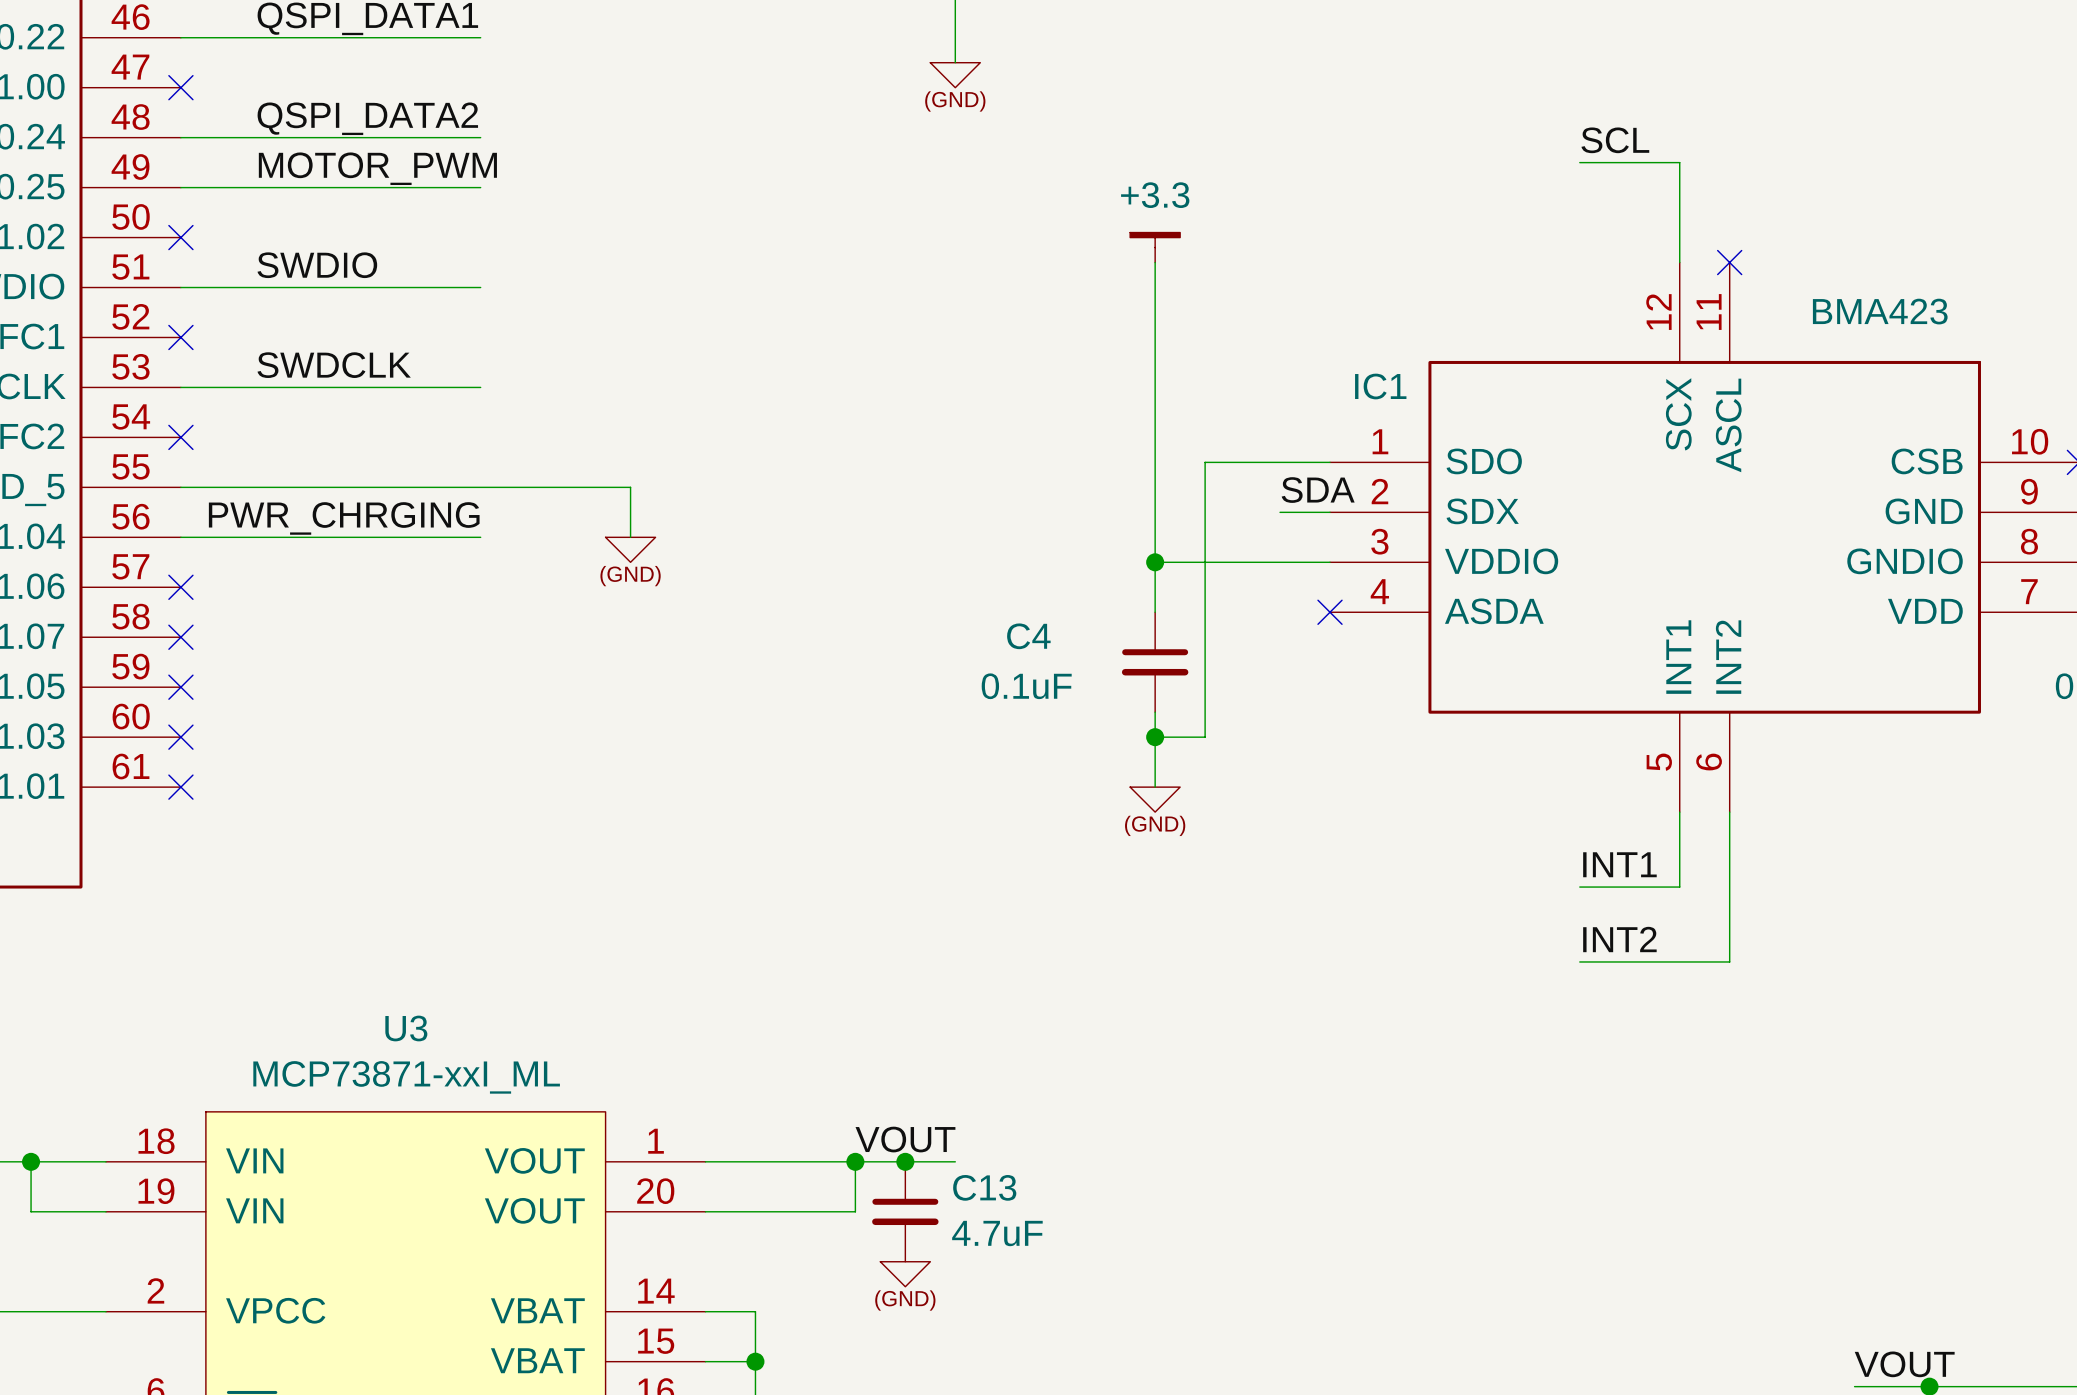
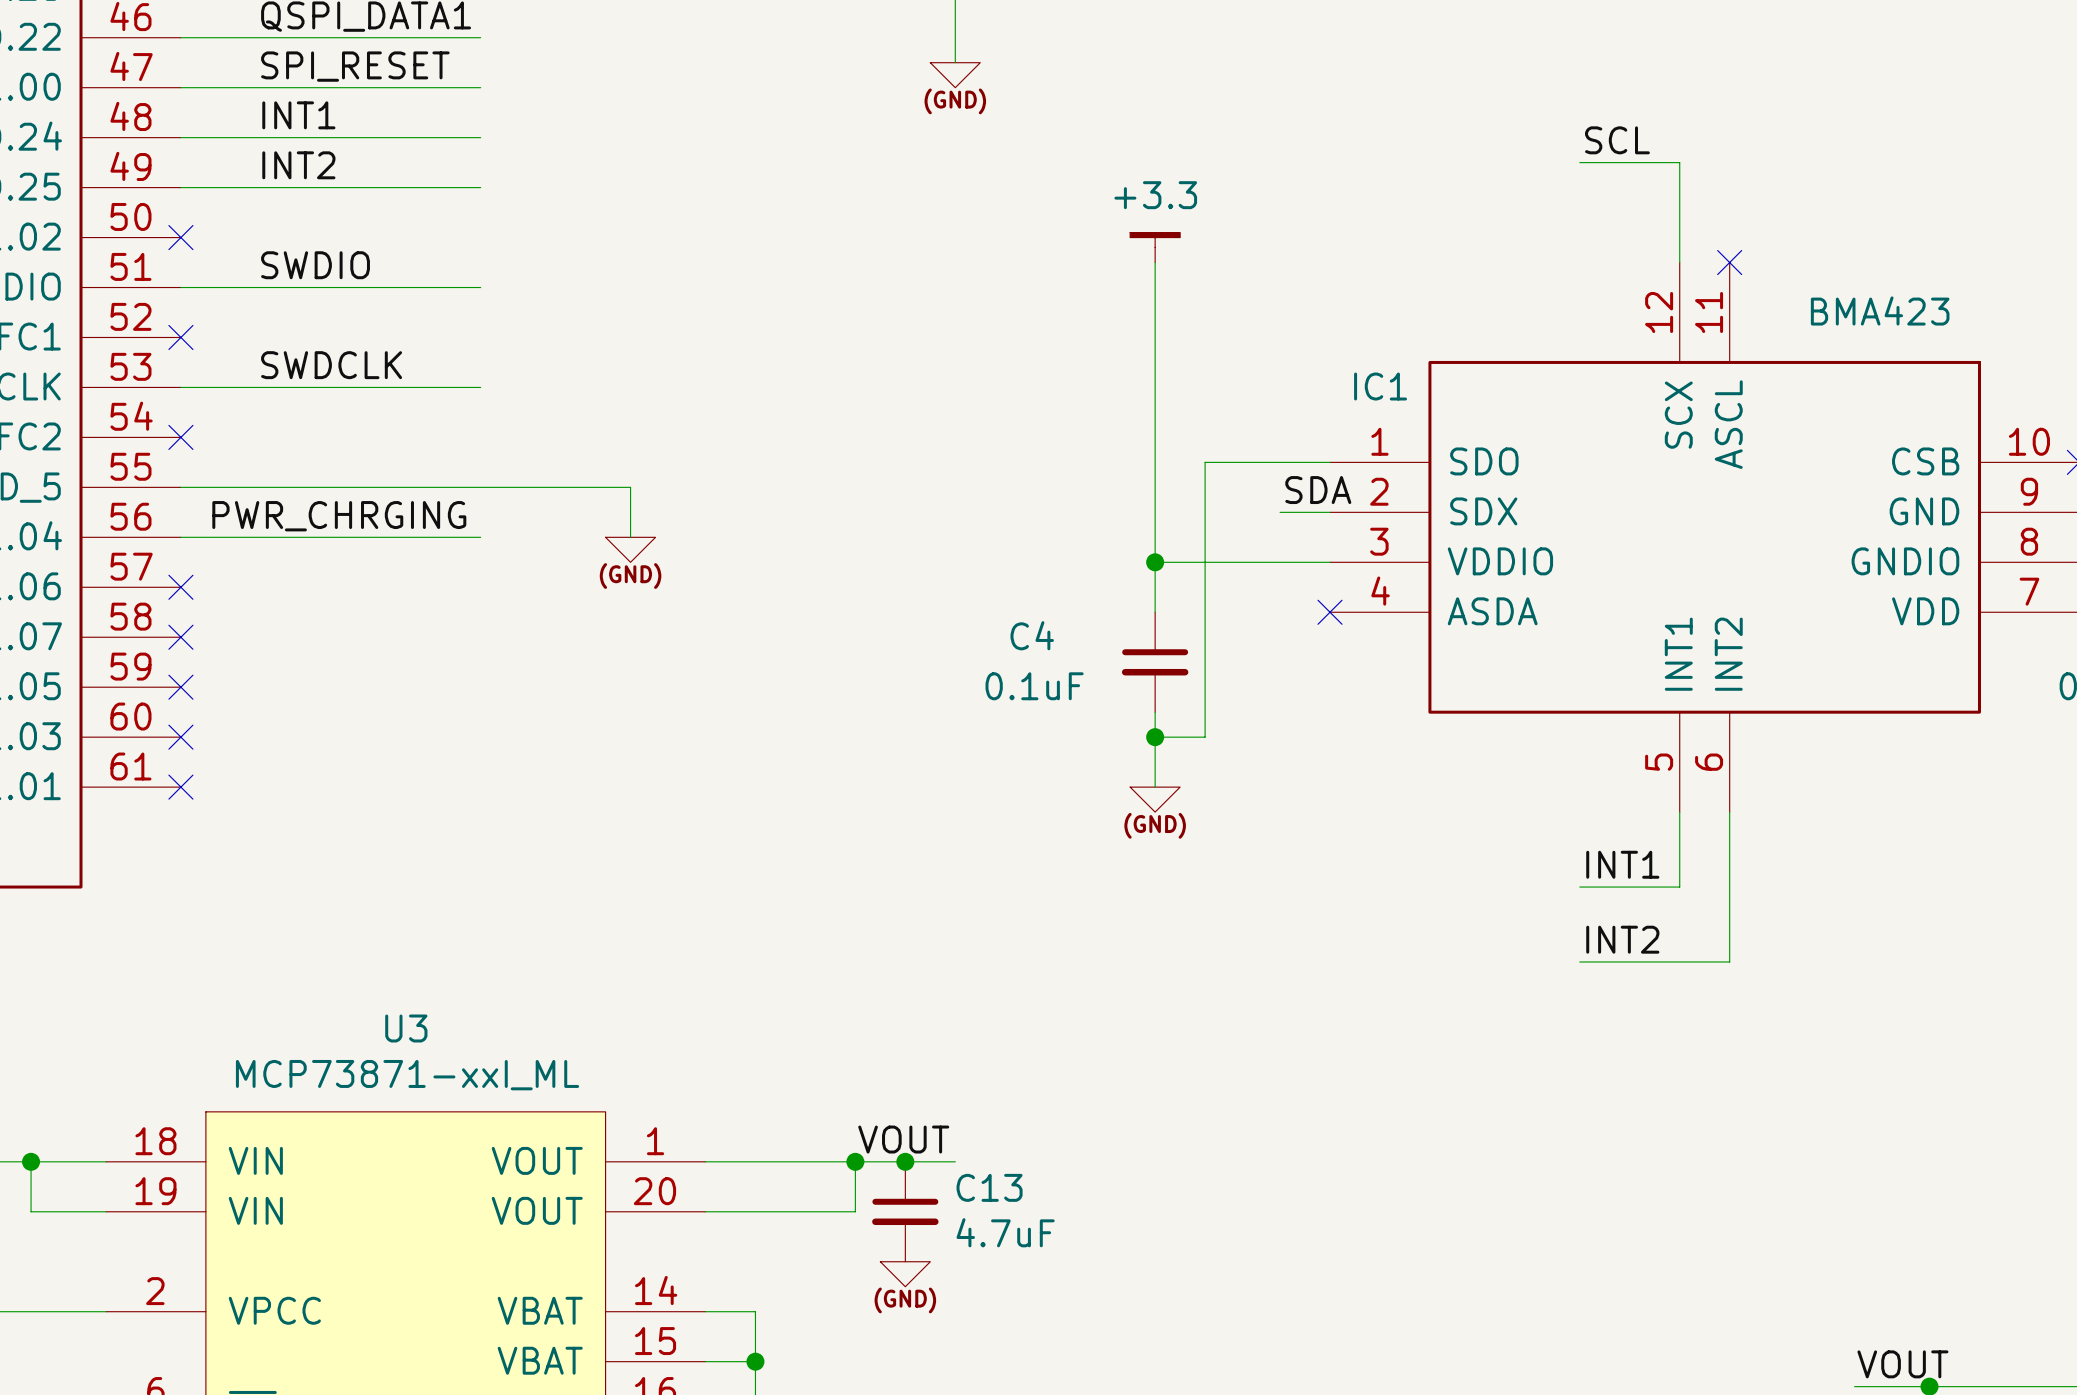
label: none -> SPI_RESET (355, 66)
wire: none -> (180, 87) (480, 87)
no-connect mark: (180, 87) -> none
label: QSPI_DATA2 (367, 118) -> INT1 (298, 115)
label: MOTOR_PWM (377, 168) -> INT2 (298, 165)

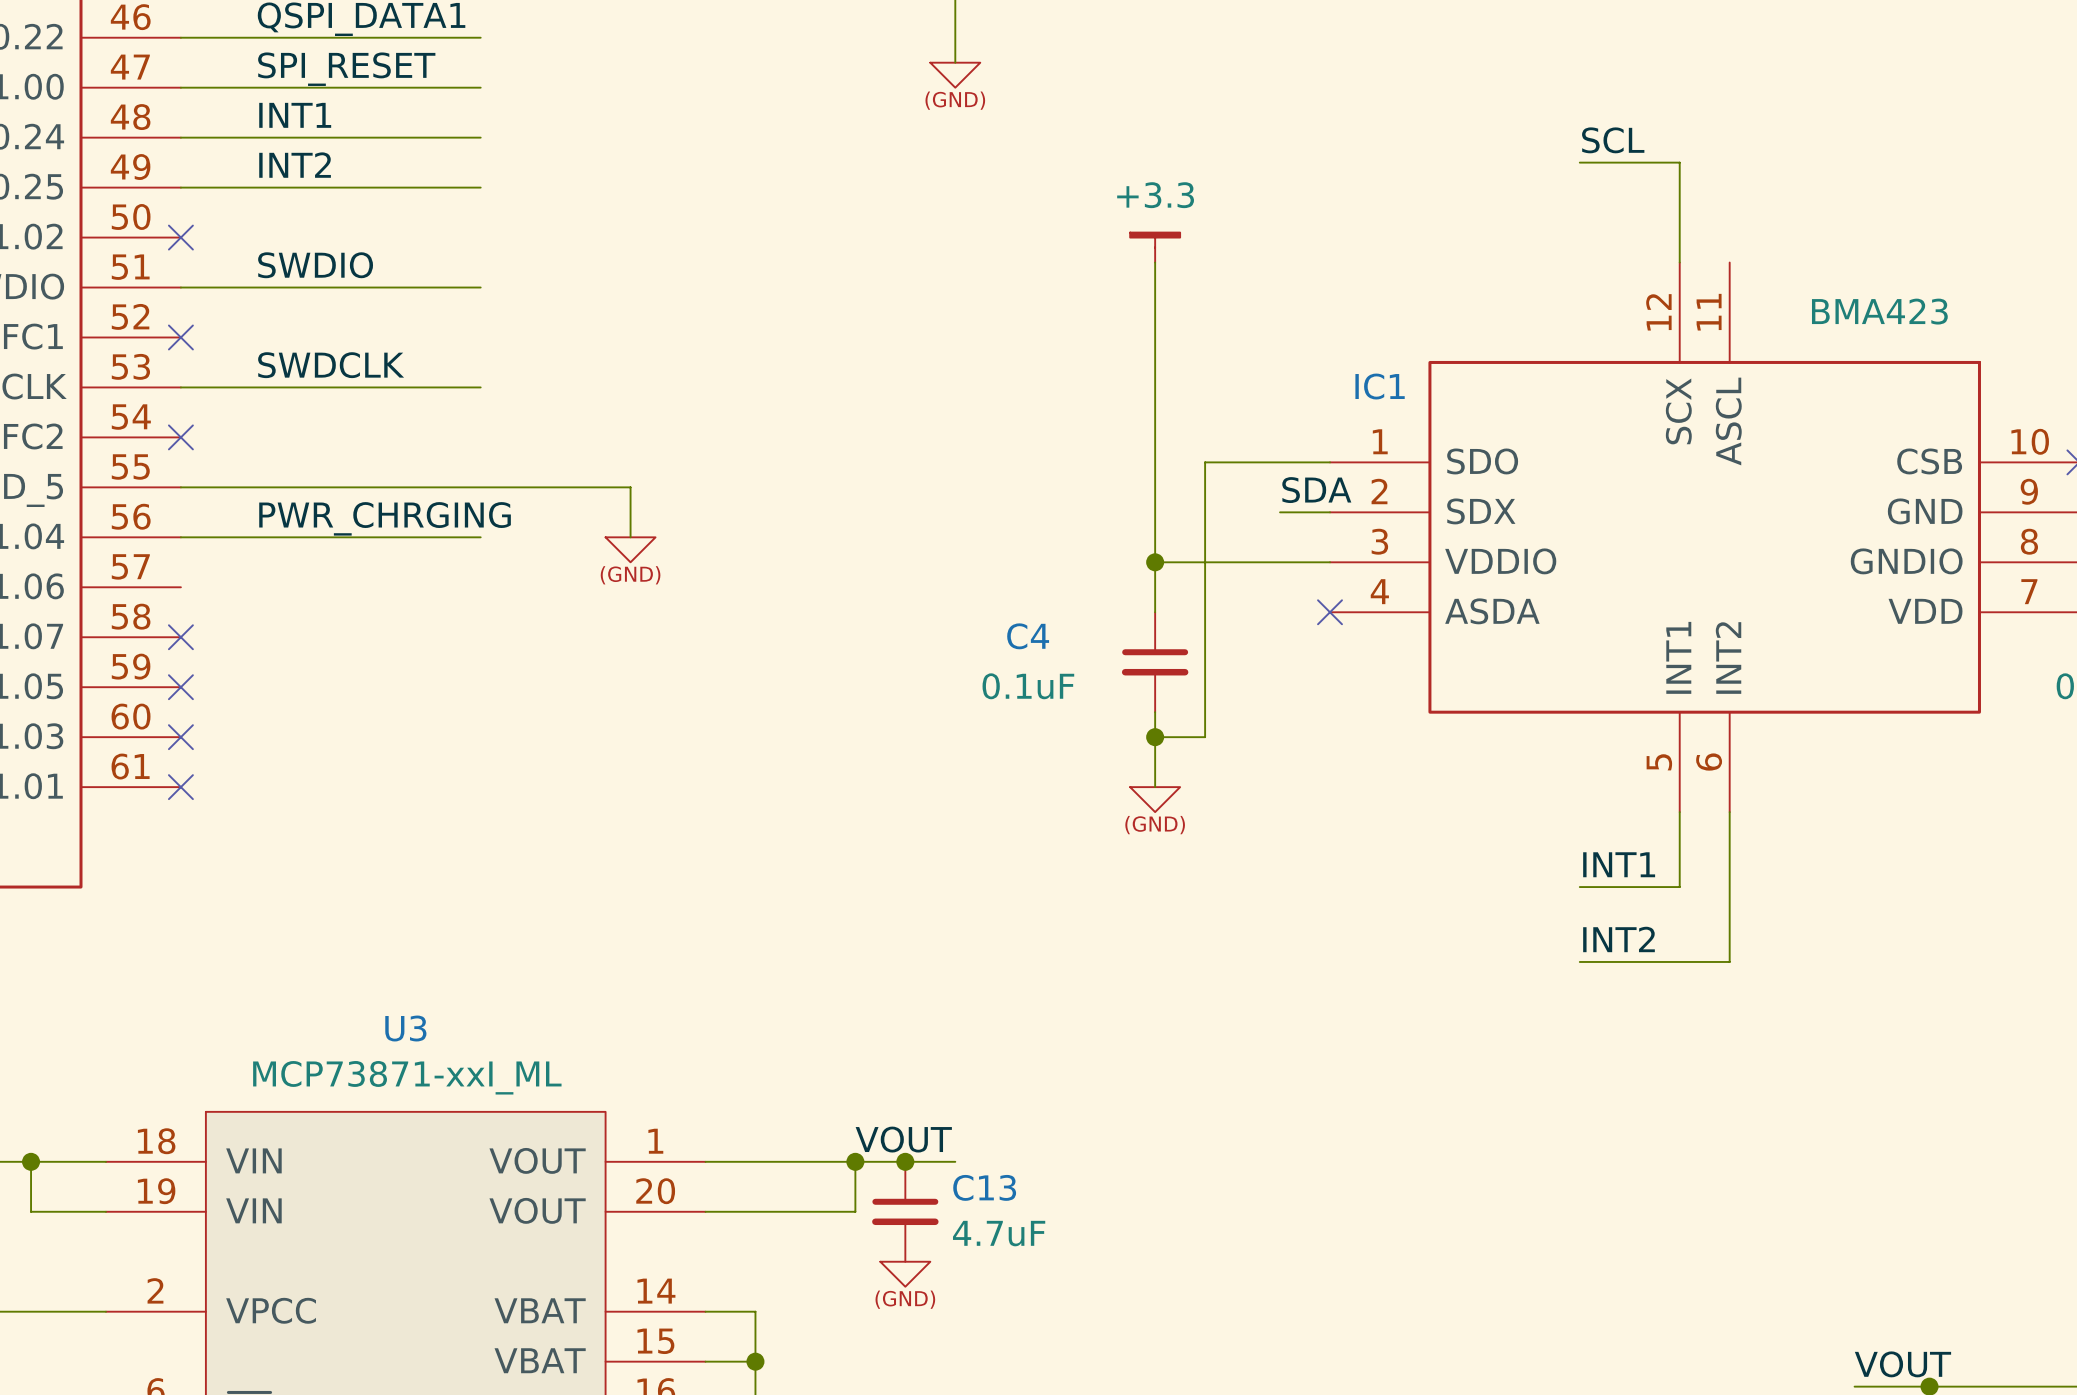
no-connect mark: (1729, 262) -> none
label position: PWR_CHRGING (339, 516) -> PWR_CHRGING (385, 518)
no-connect mark: (180, 587) -> none

